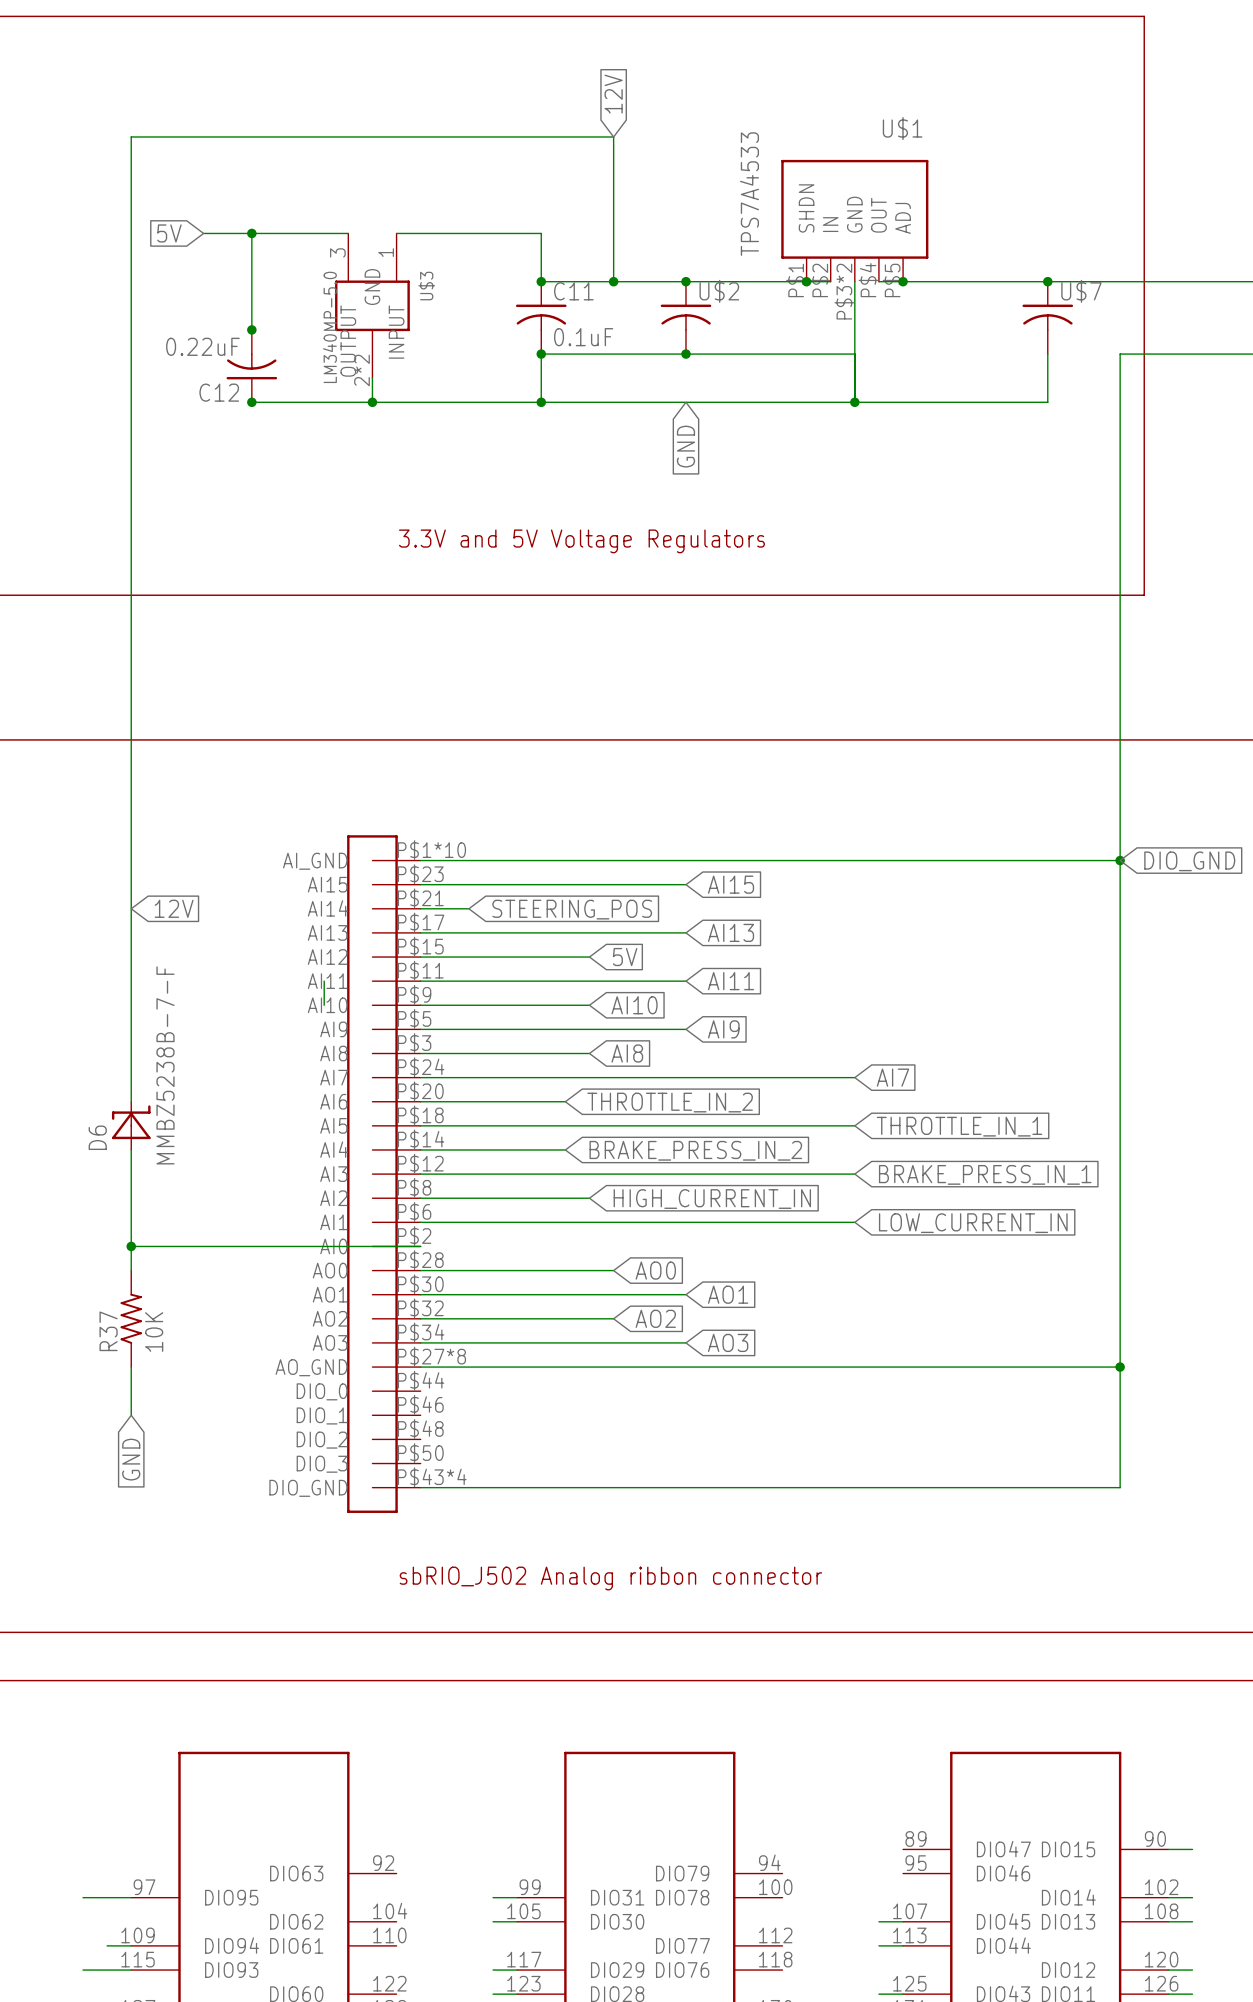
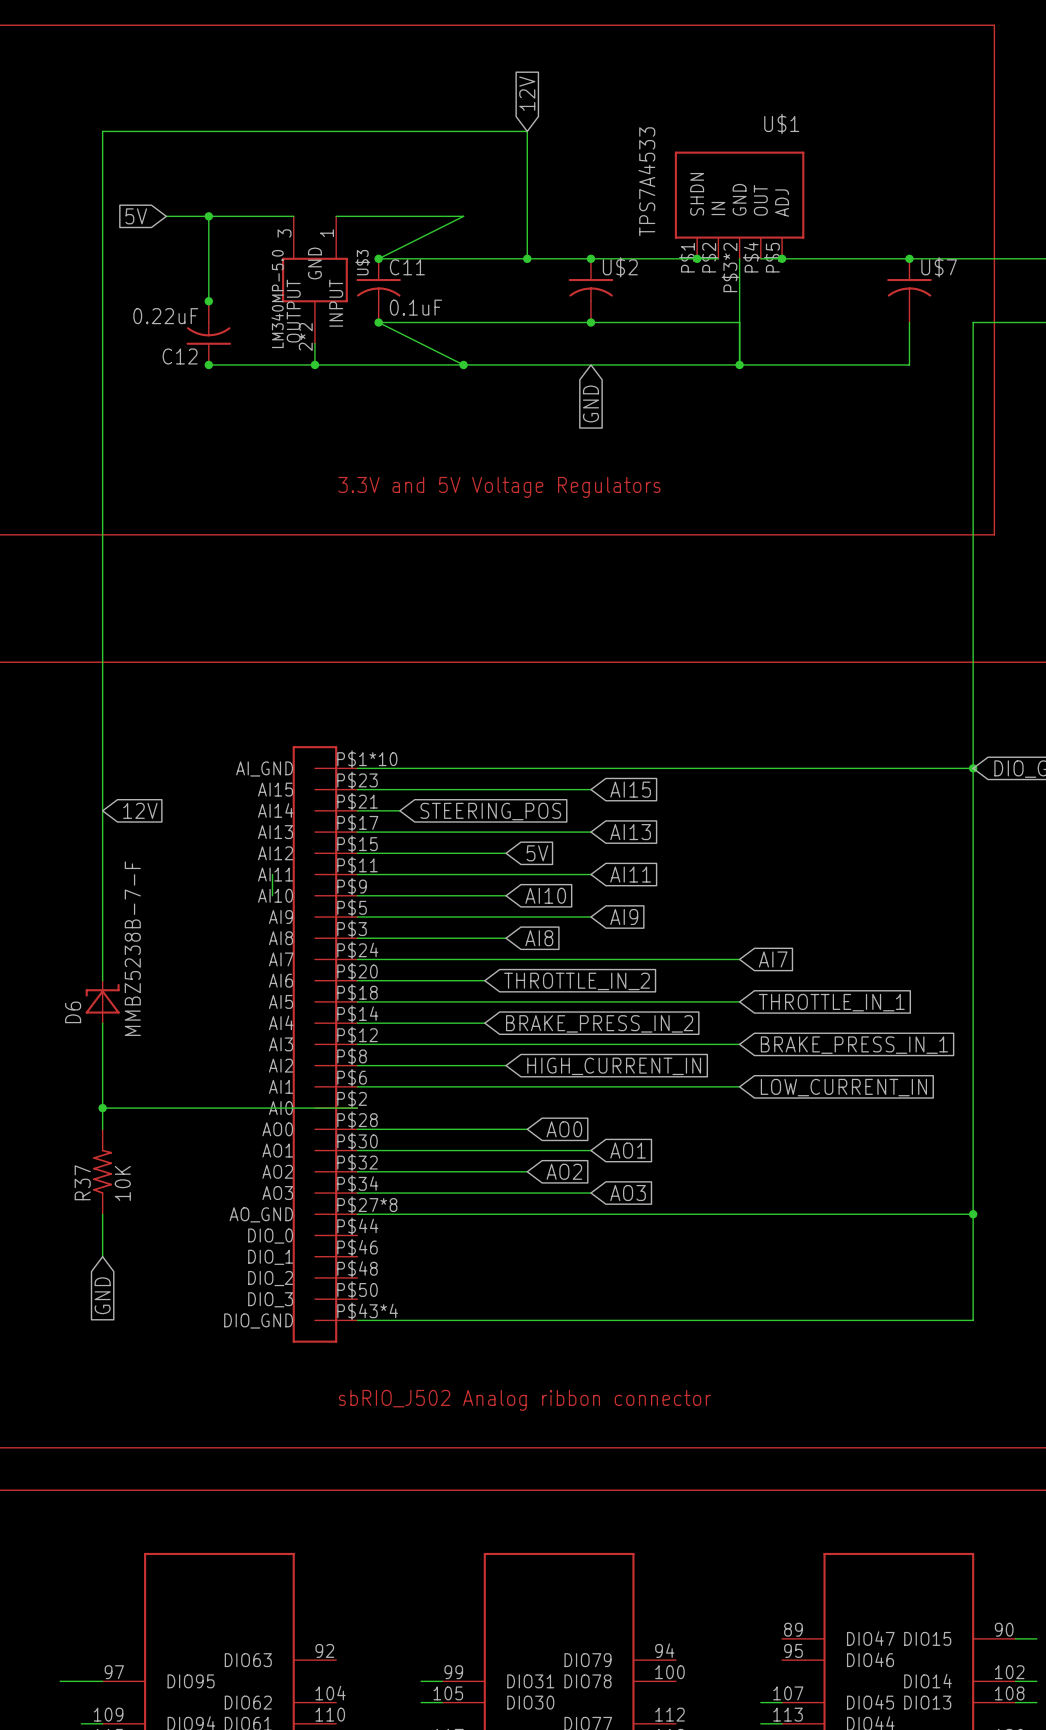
wire: (541, 233) (541, 281) -> (463, 216) (378, 258) (463, 258)
junction: none -> (378, 258)
junction: (541, 281) -> none
C11 position: (541, 317) -> (378, 290)
junction: none -> (378, 322)
wire: (541, 354) (541, 402) -> (463, 322) (378, 322) (463, 364)
junction: (541, 354) -> none

